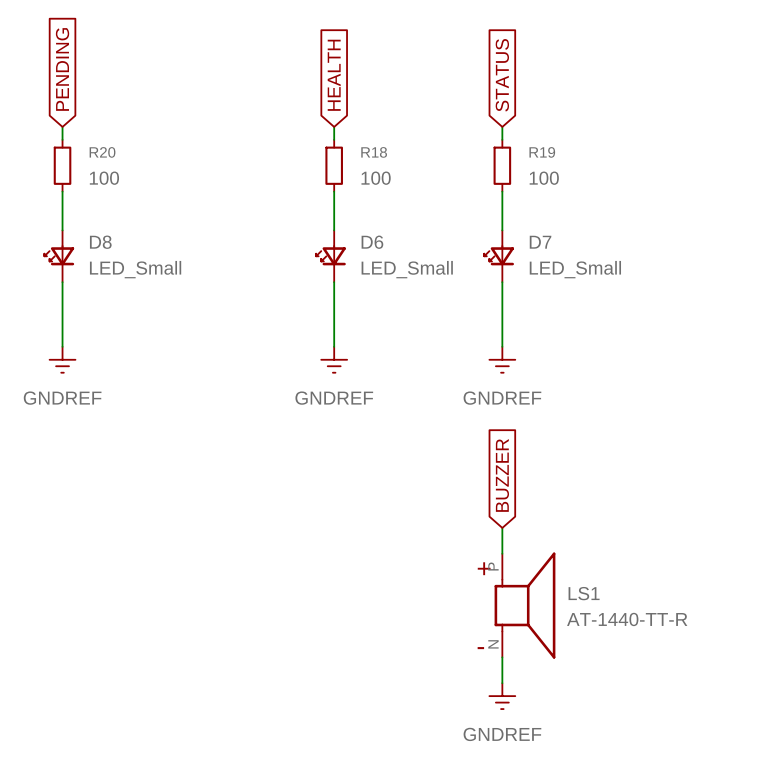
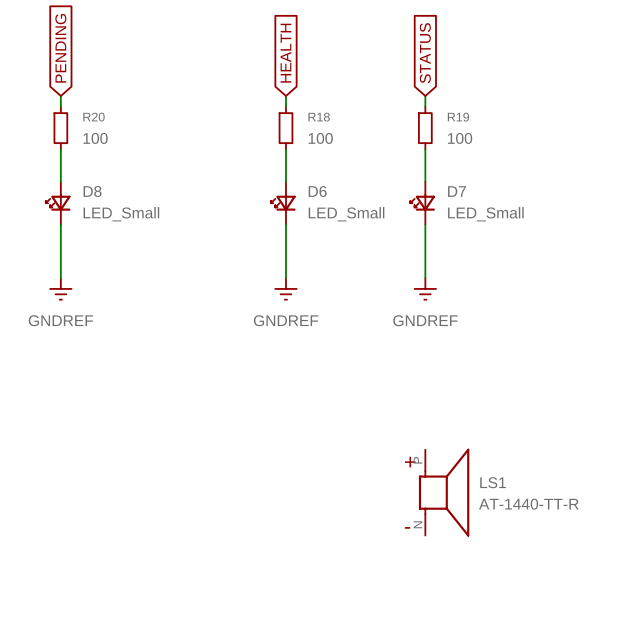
global label: BUZZER (502, 475) -> none
wire: (502, 527) (502, 553) -> none
wire: (502, 657) (502, 683) -> none
power symbol: GNDREF (502, 696) -> none

